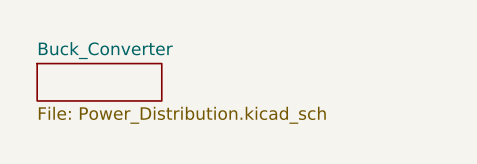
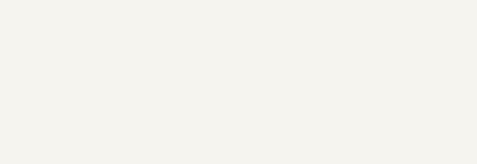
sheet Buck_Converter: File: Power_Distribution.kicad_sch (99, 82) -> none

